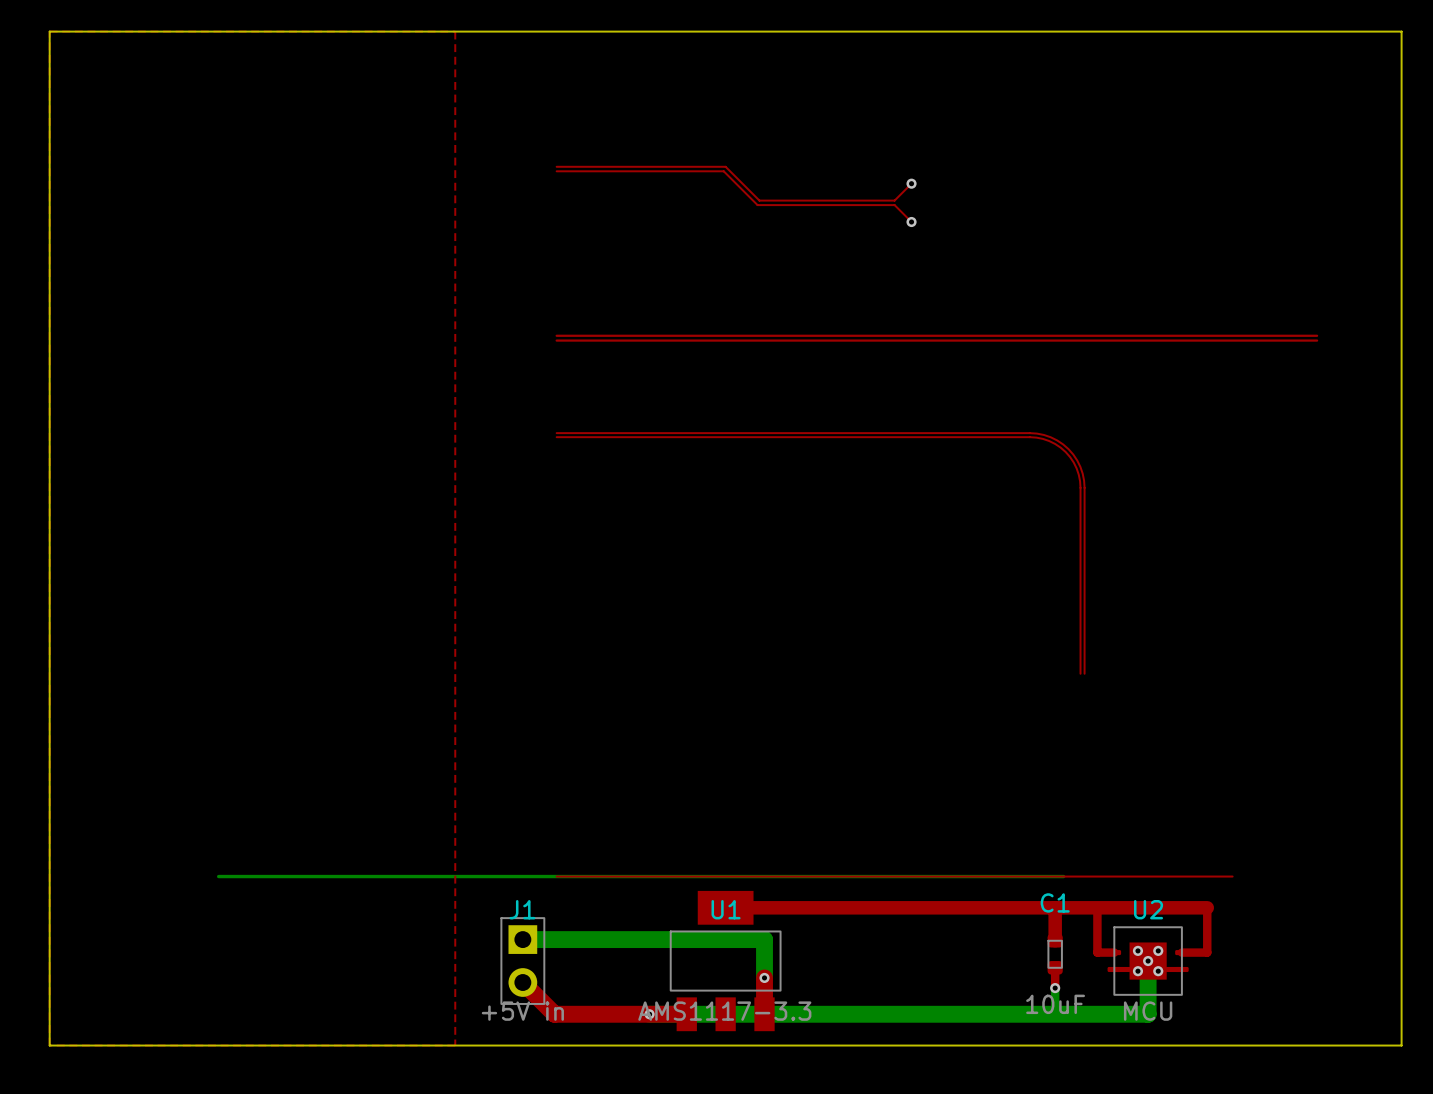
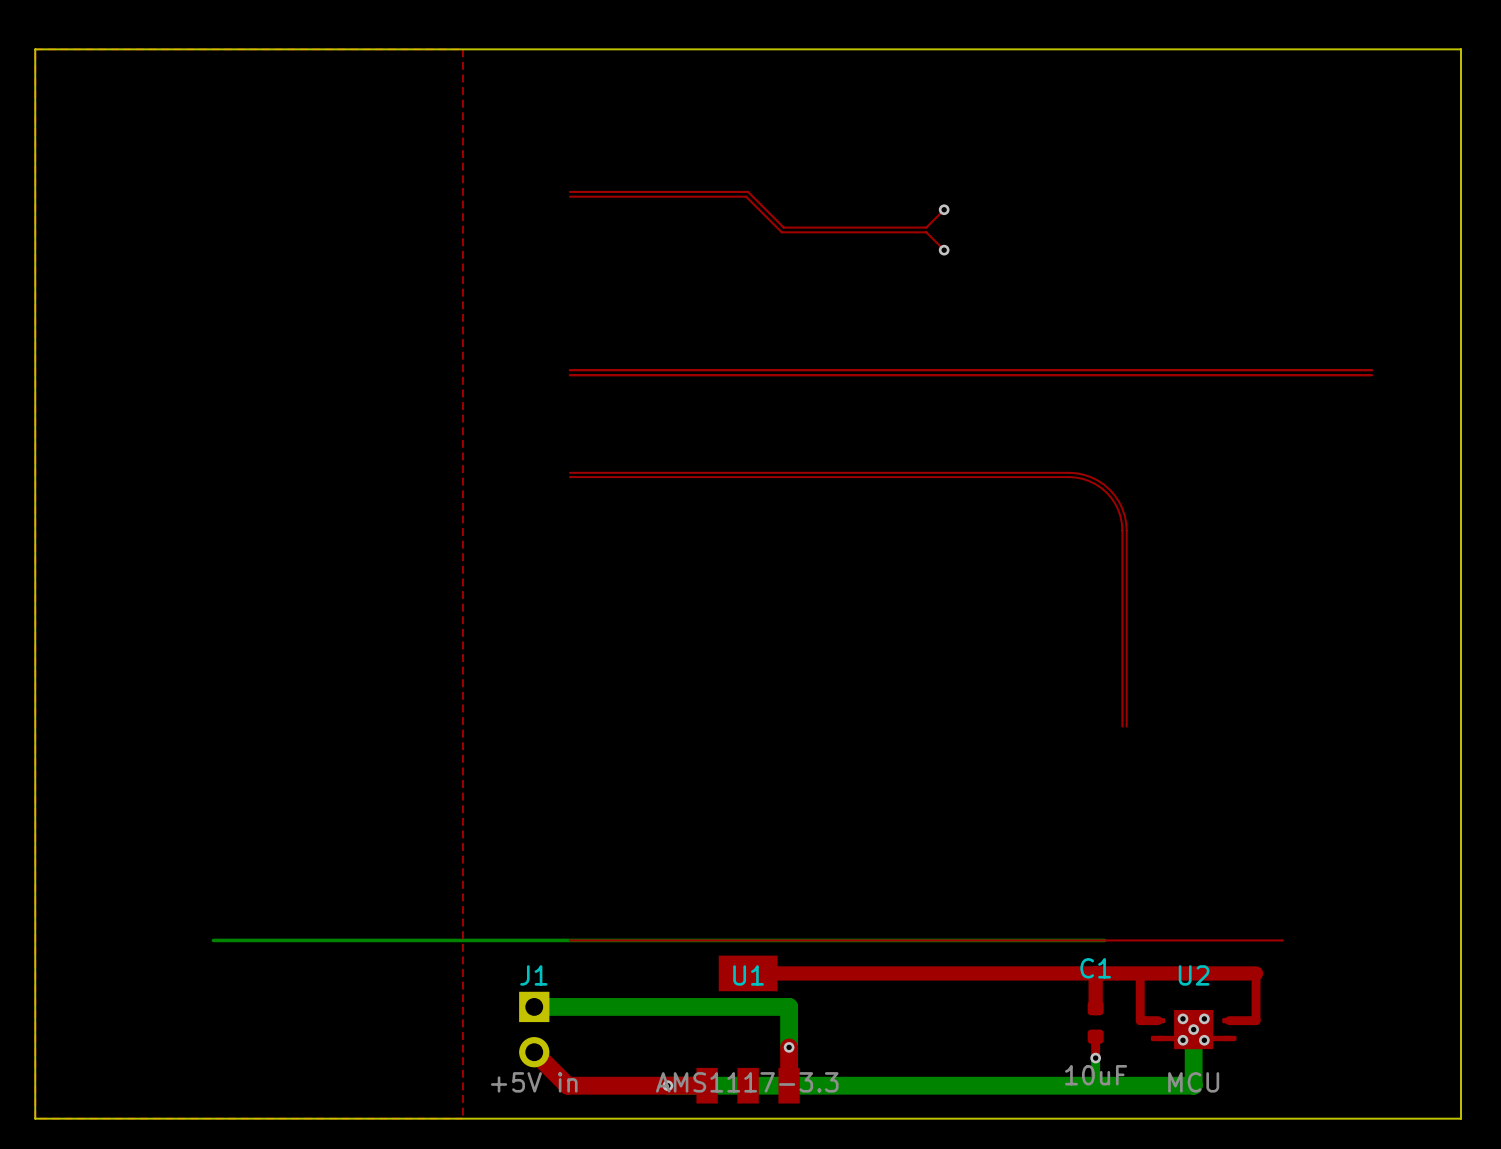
U1 footprint: [669, 890, 782, 1032] -> [696, 955, 800, 1104]
J1 footprint: [500, 917, 546, 1005] -> [519, 991, 550, 1068]
U2 footprint: [1107, 926, 1189, 996] -> [1150, 1009, 1237, 1050]
C1 footprint: [1047, 934, 1063, 975] -> [1087, 1001, 1104, 1044]

